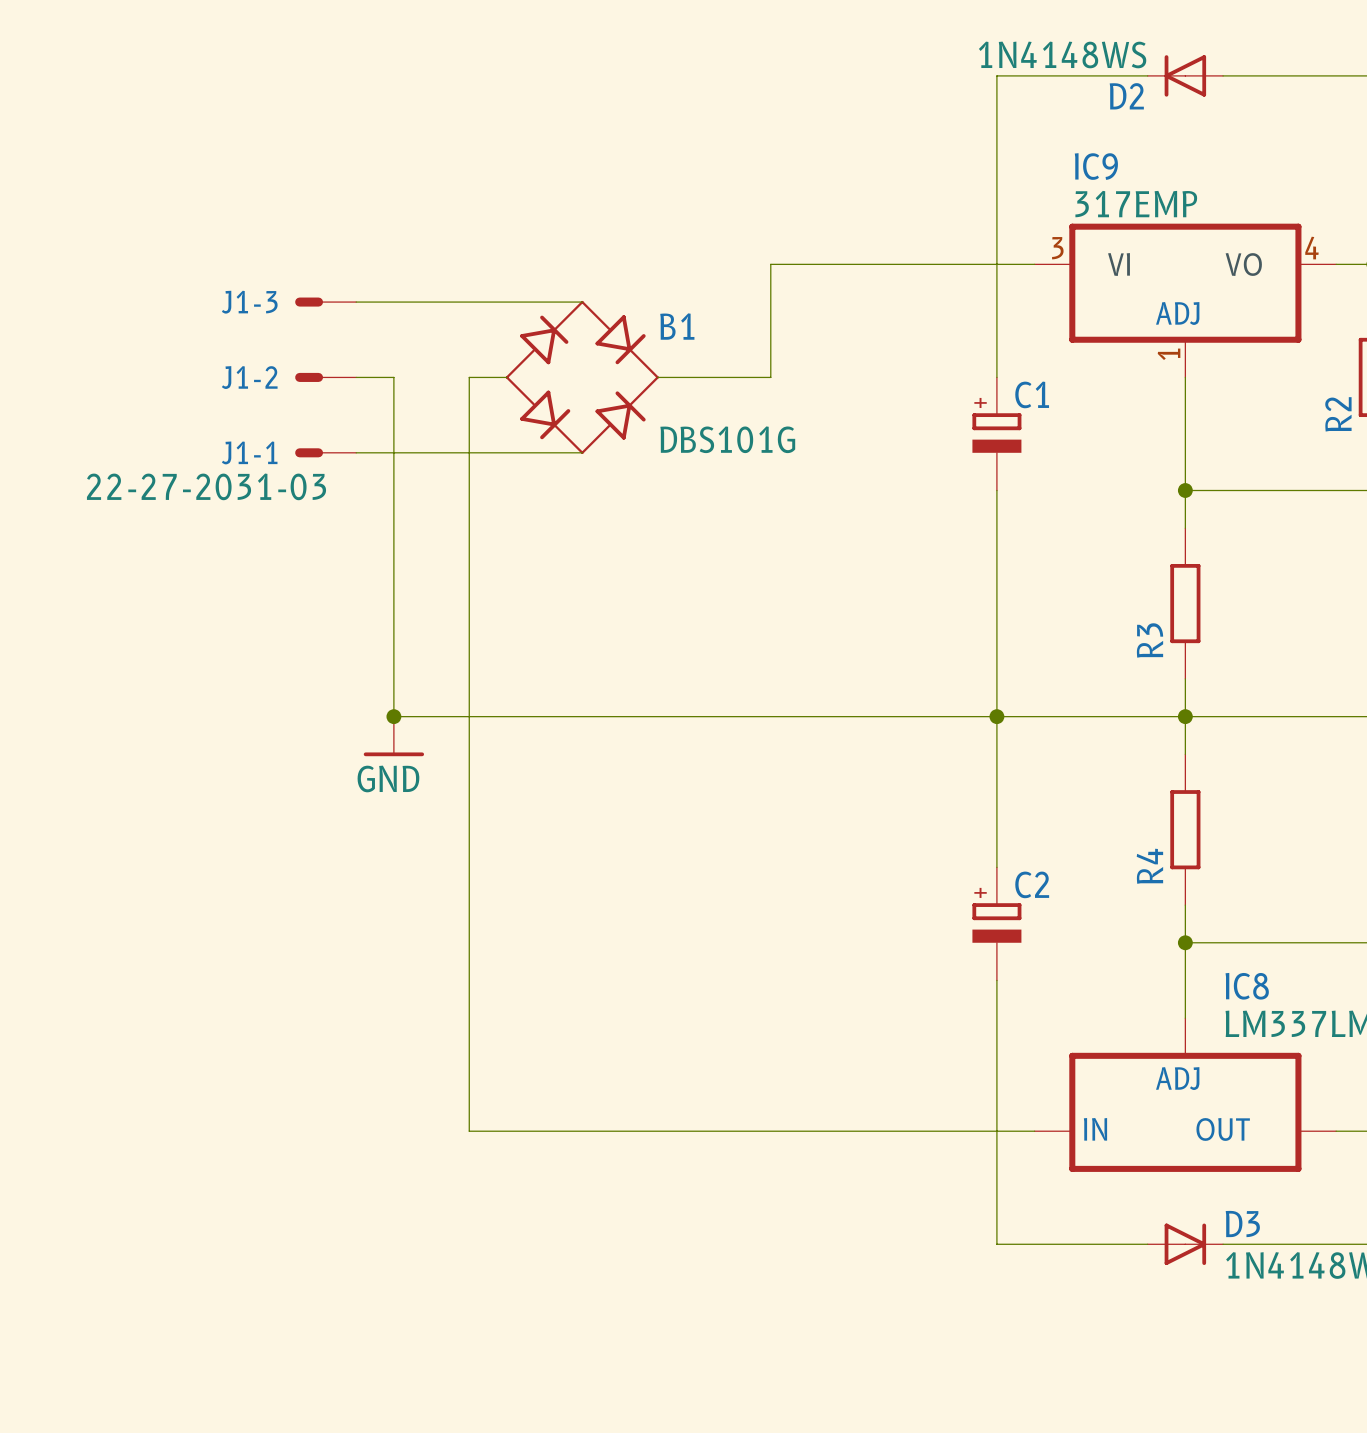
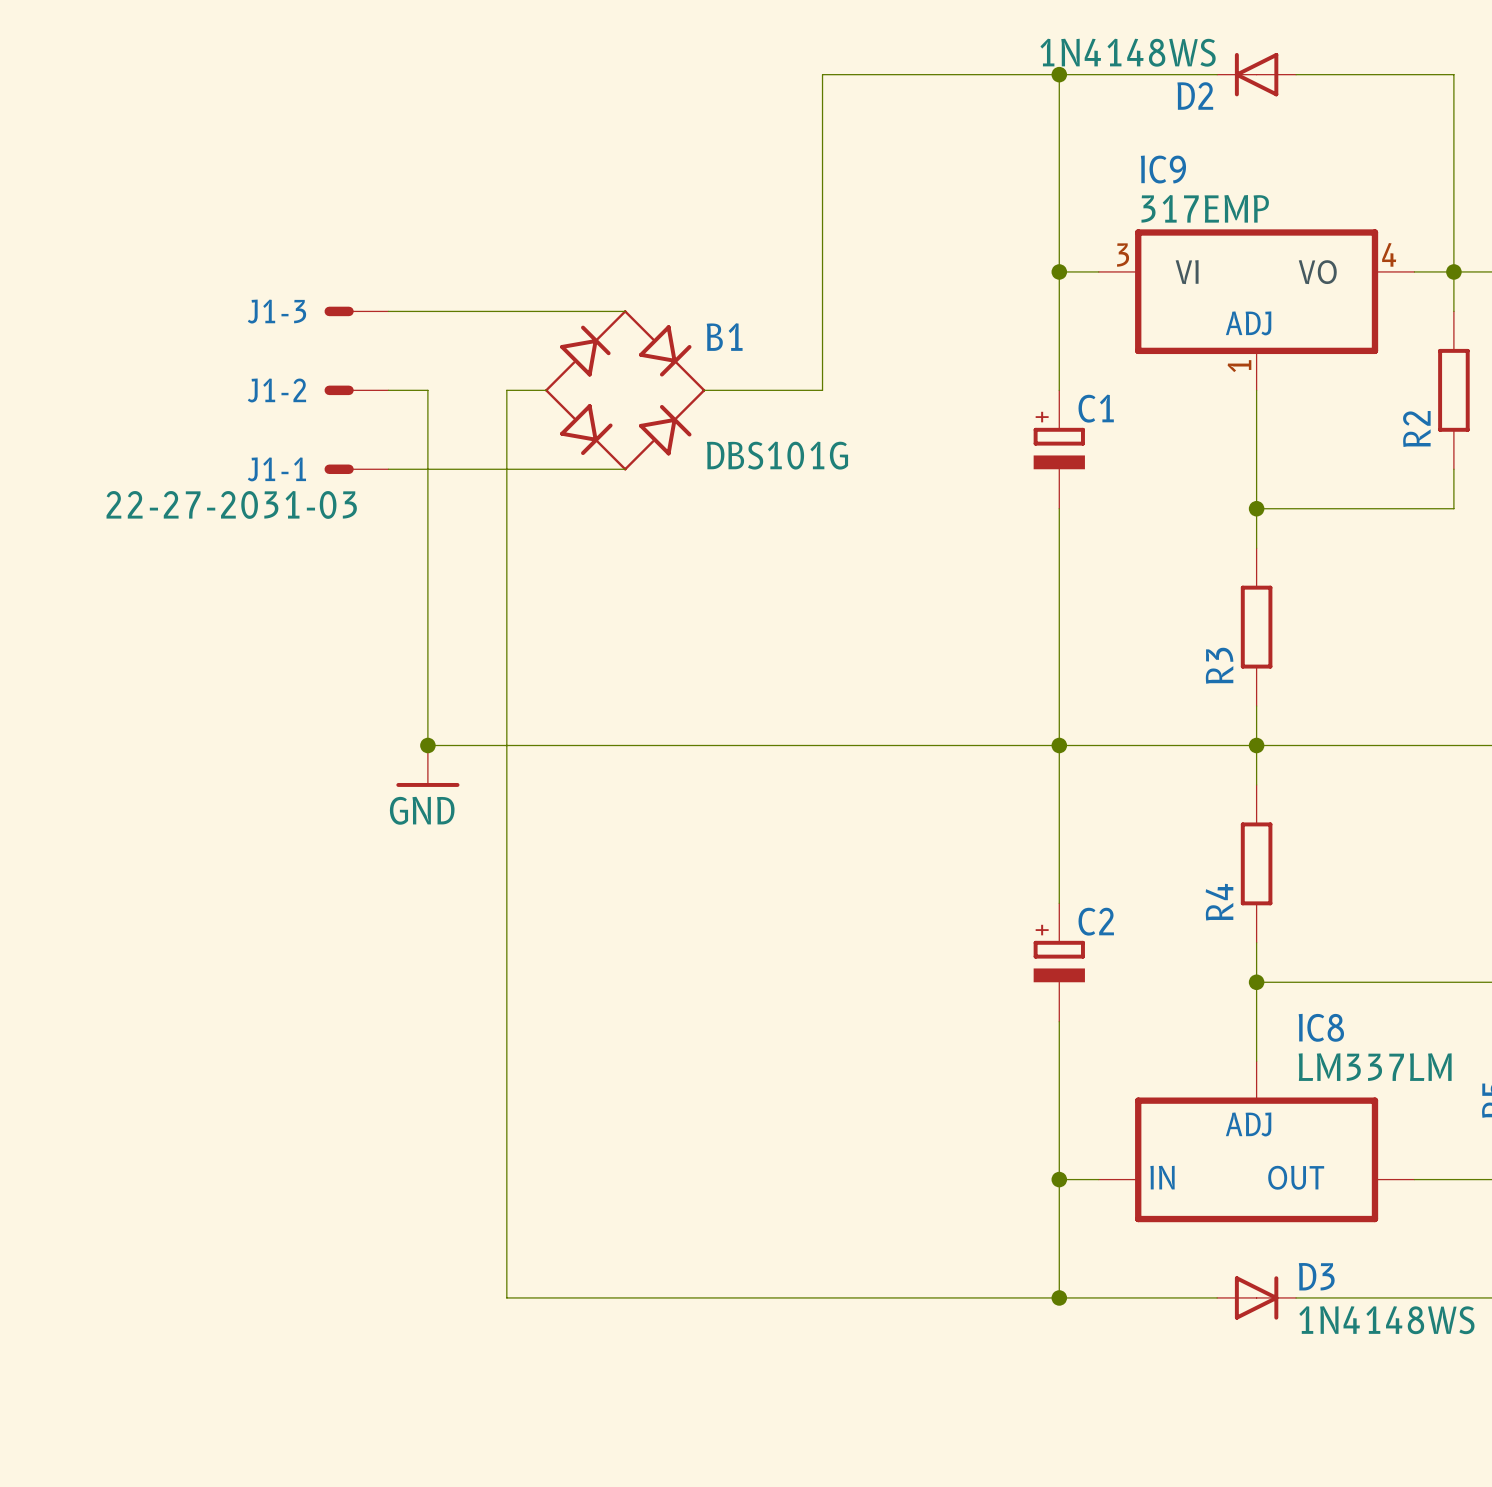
junction: none -> (1059, 74)
wire: (770, 264) (996, 264) -> (822, 271) (822, 74) (1059, 74)
junction: none -> (1059, 271)
wire: (469, 1131) (996, 1131) -> (506, 1179) (506, 1297) (1059, 1297)
junction: none -> (1059, 1179)
junction: none -> (1059, 1297)

